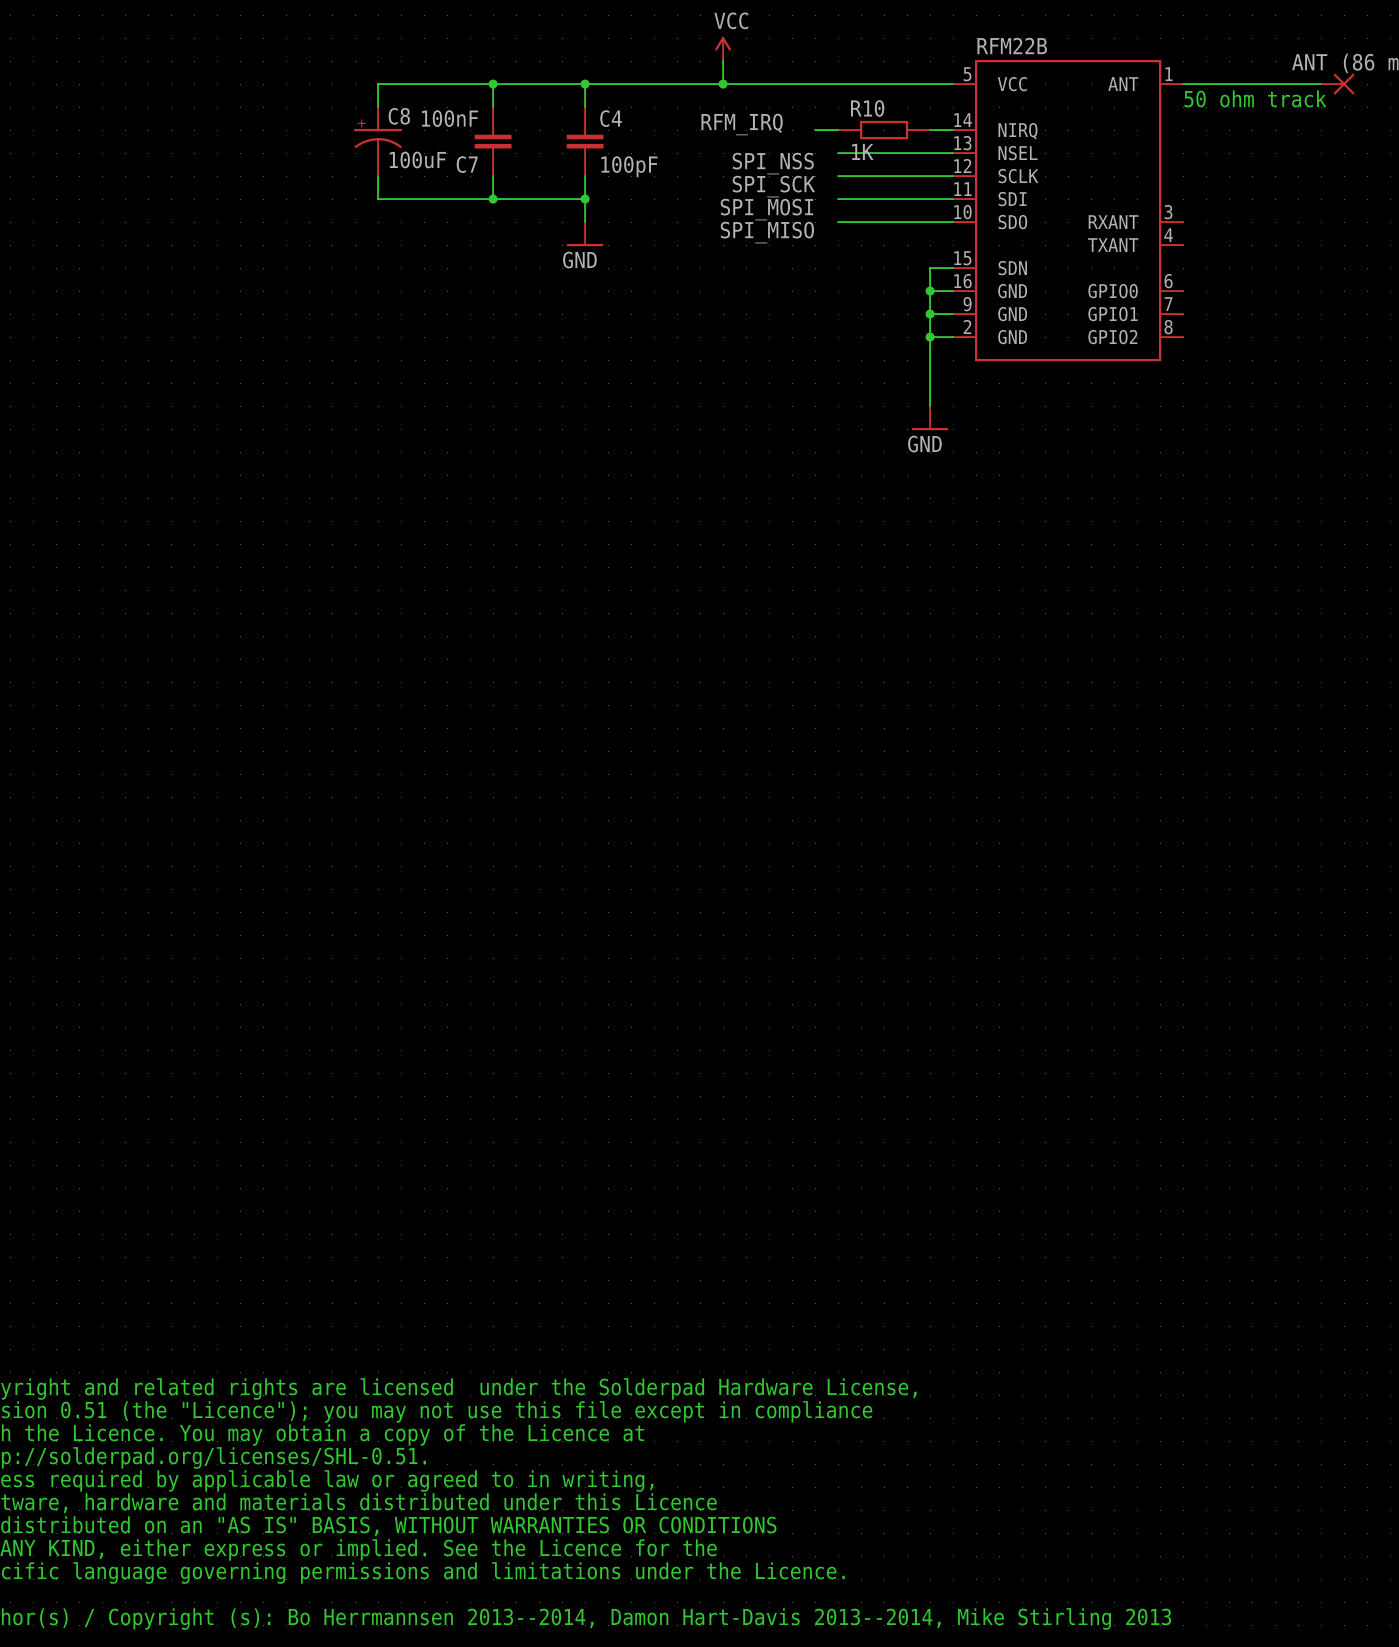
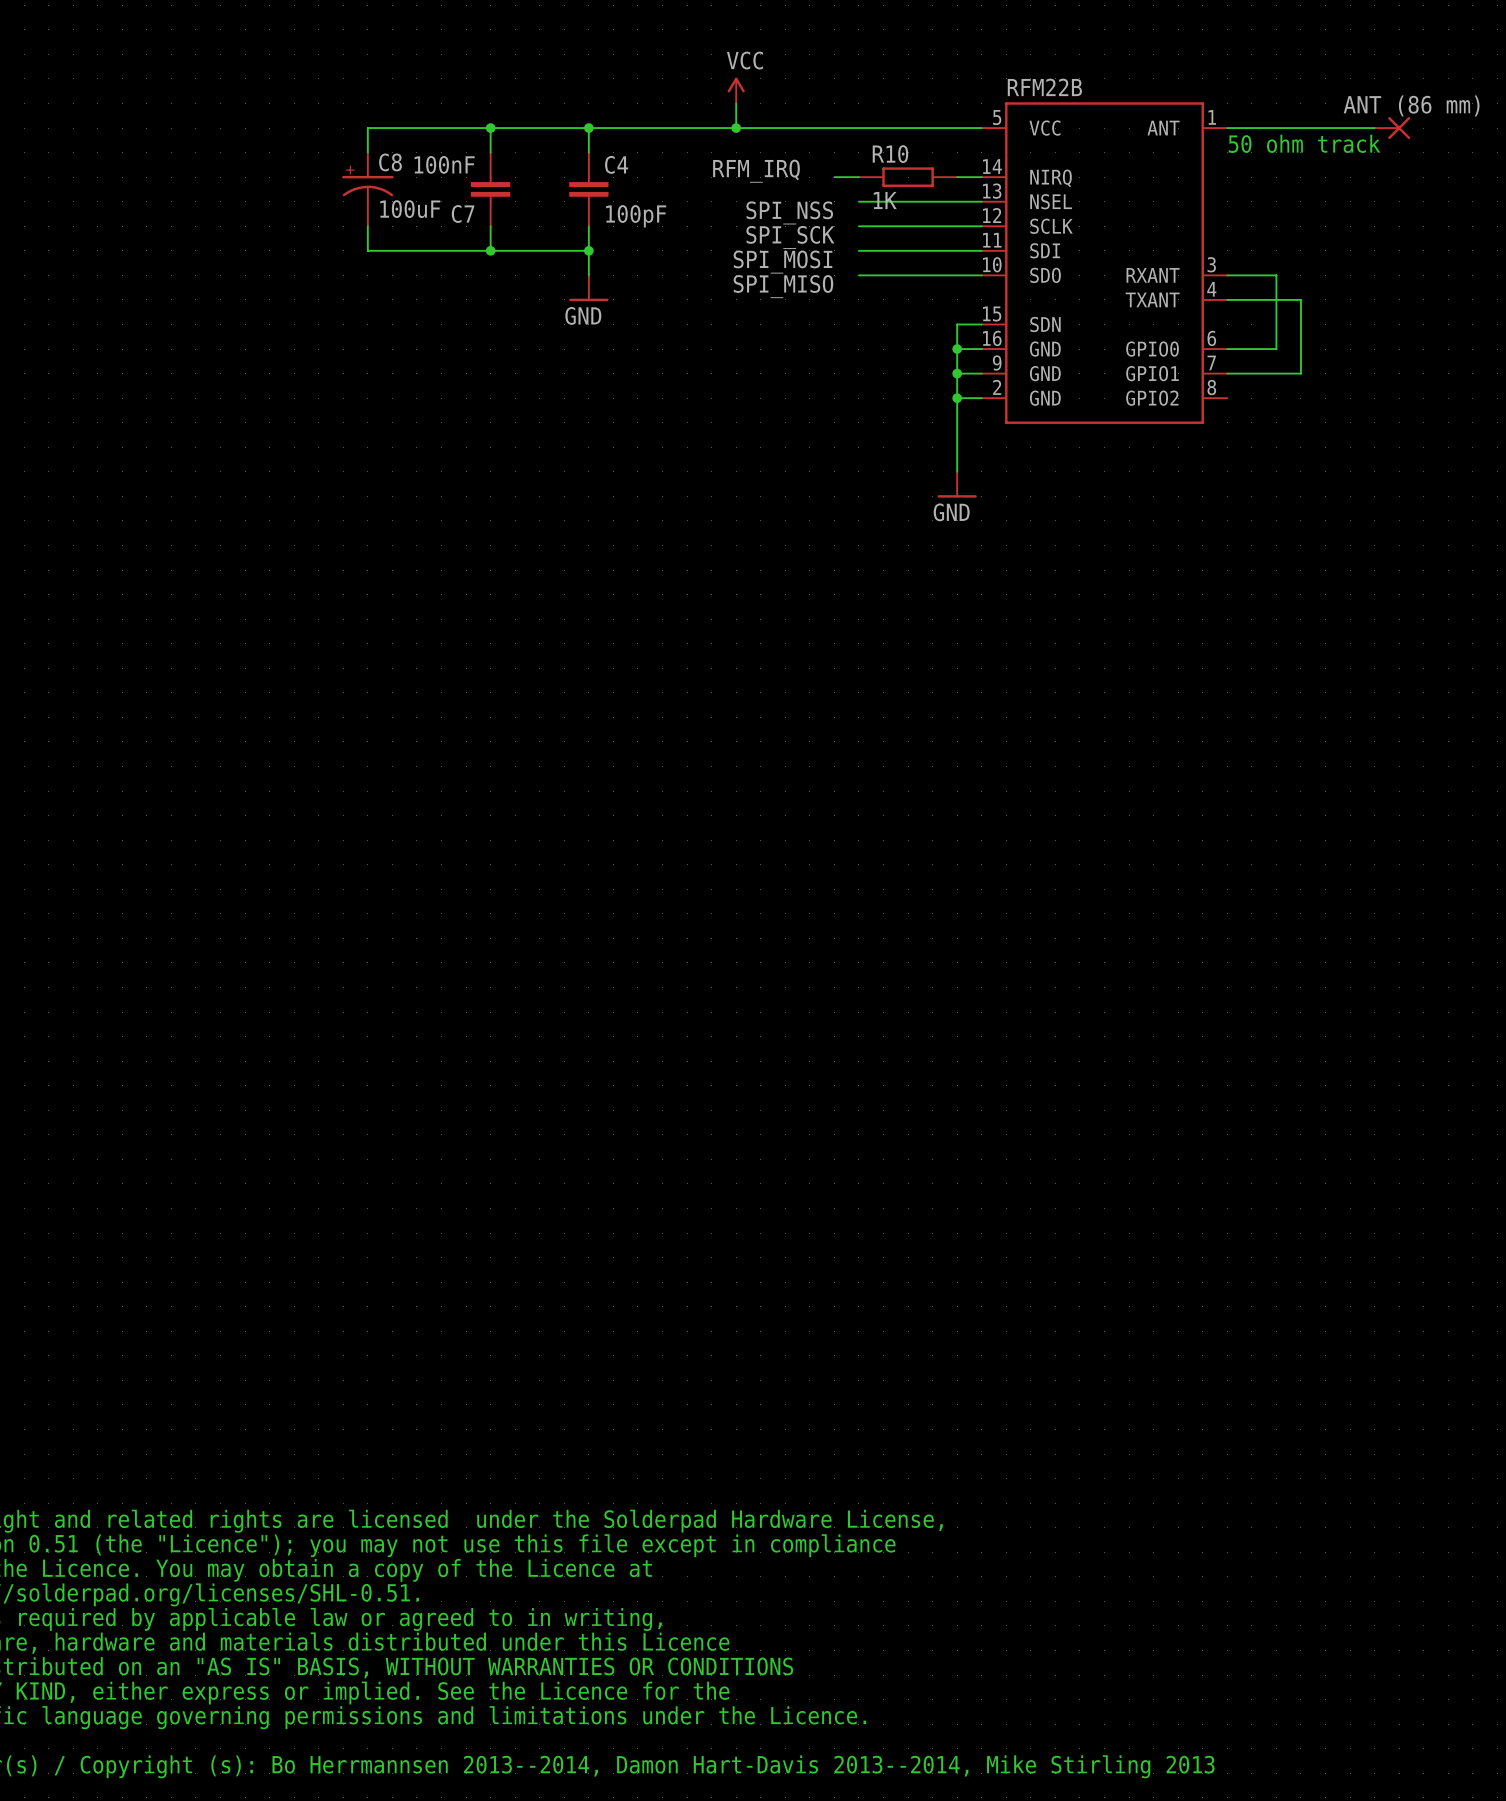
wire: none -> (1227, 275) (1276, 275) (1276, 349) (1227, 349)
wire: none -> (1227, 299) (1300, 299) (1300, 373) (1227, 373)

